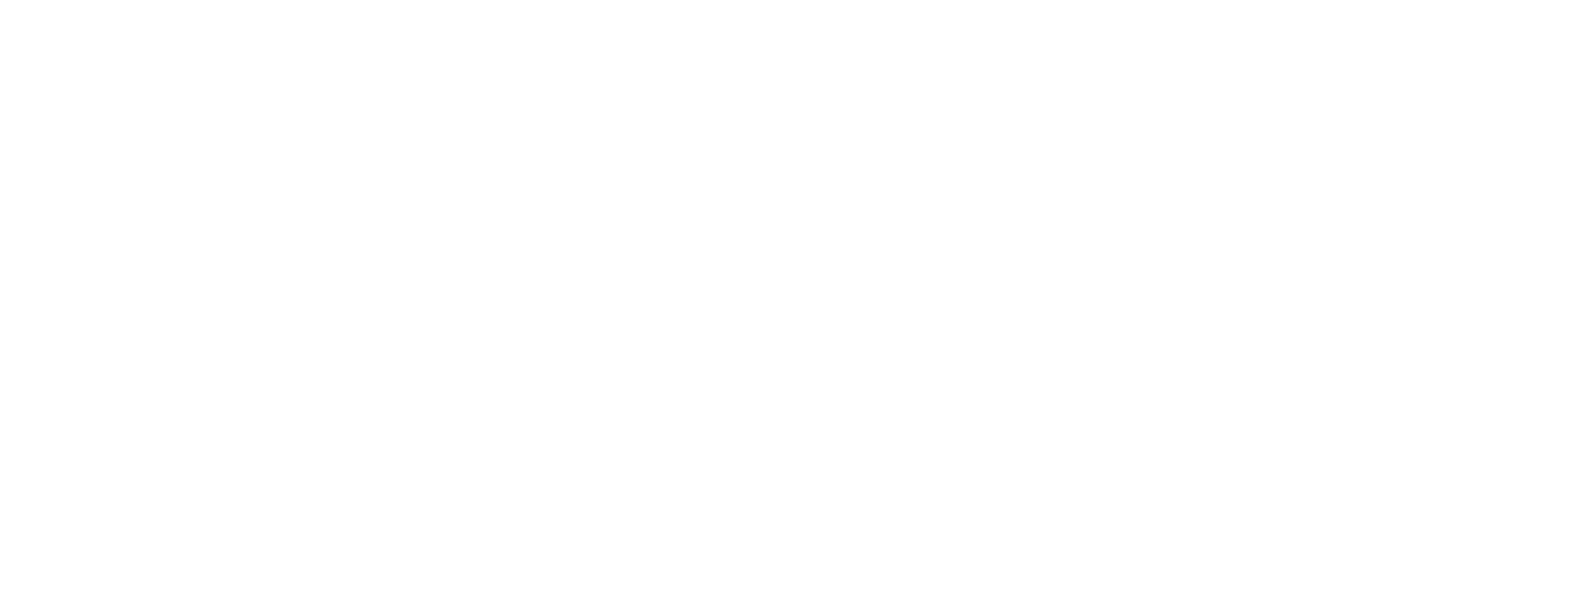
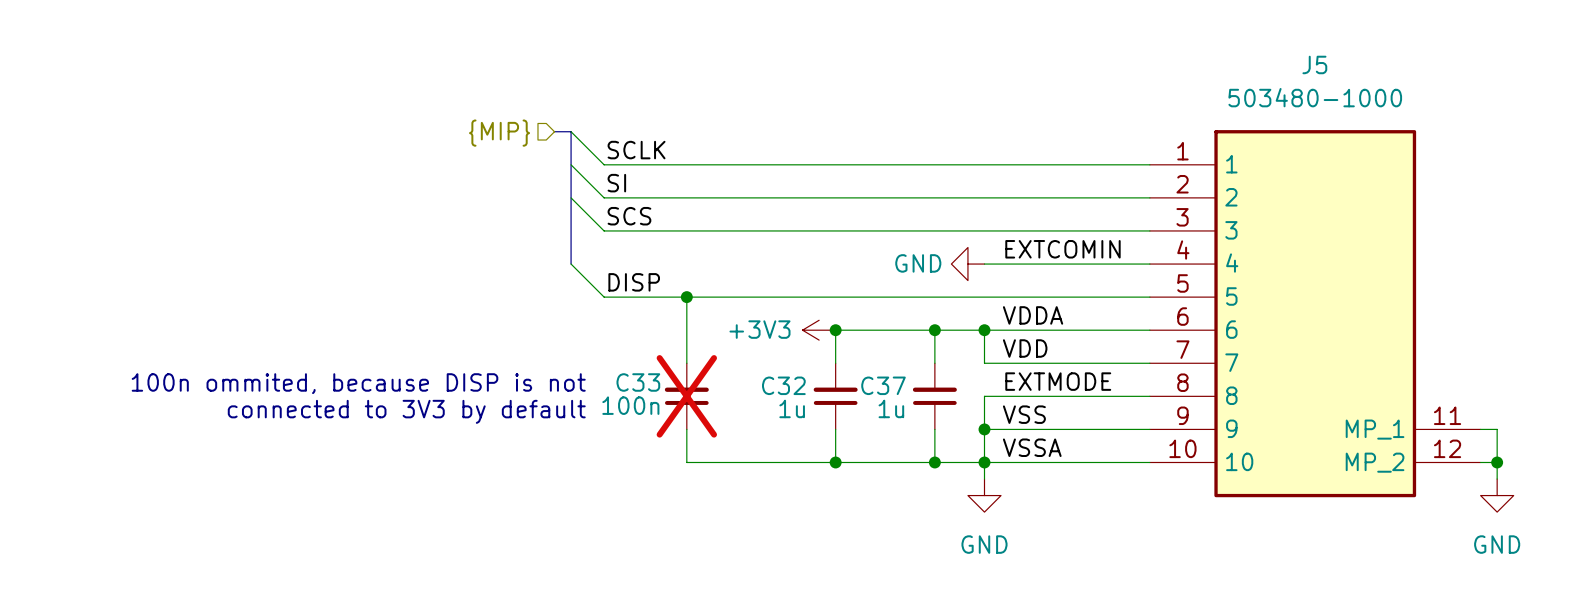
bus: none -> (554, 131) (571, 131) (571, 264)
wire: none -> (571, 131) (604, 164) (1149, 164)
hierarchical label: none -> {MIP} (499, 133)
label: none -> SCLK (636, 150)
wire: none -> (571, 164) (604, 197) (1149, 197)
label: none -> SI (616, 183)
wire: none -> (571, 197) (604, 230) (1149, 230)
label: none -> SCS (629, 216)
label: none -> EXTCOMIN (1062, 249)
wire: none -> (571, 264) (604, 297) (1149, 297)
power symbol: none -> GND (967, 264)
wire: none -> (984, 264) (1149, 264)
label: none -> DISP (634, 282)
wire: none -> (686, 297) (686, 363)
junction: none -> (686, 297)
J5: none -> 503480-1000 (1315, 313)
label: none -> VDDA (1033, 315)
power symbol: none -> +3V3 (819, 330)
junction: none -> (835, 330)
wire: none -> (934, 330) (934, 363)
junction: none -> (934, 330)
wire: none -> (984, 330) (984, 363) (1149, 363)
junction: none -> (984, 330)
wire: none -> (1149, 330) (835, 330) (835, 363)
label: none -> VDD (1025, 348)
label: none -> EXTMODE (1058, 381)
text: none -> 100n ommited, because DISP is not (358, 383)
C33: none -> 100n (686, 396)
C32: none -> 1u (835, 396)
C37: none -> 1u (934, 396)
wire: none -> (1149, 396) (984, 396) (984, 479)
text: none -> connected to 3V3 by default (406, 411)
label: none -> VSS (1024, 414)
wire: none -> (686, 429) (686, 462) (1149, 462)
wire: none -> (835, 429) (835, 462)
wire: none -> (934, 429) (934, 462)
wire: none -> (984, 429) (1149, 429)
junction: none -> (984, 429)
wire: none -> (1480, 429) (1497, 429) (1497, 479)
label: none -> VSSA (1032, 447)
junction: none -> (835, 462)
junction: none -> (934, 462)
junction: none -> (984, 462)
wire: none -> (1480, 462) (1497, 462)
junction: none -> (1497, 462)
power symbol: none -> GND (984, 495)
power symbol: none -> GND (1497, 495)

